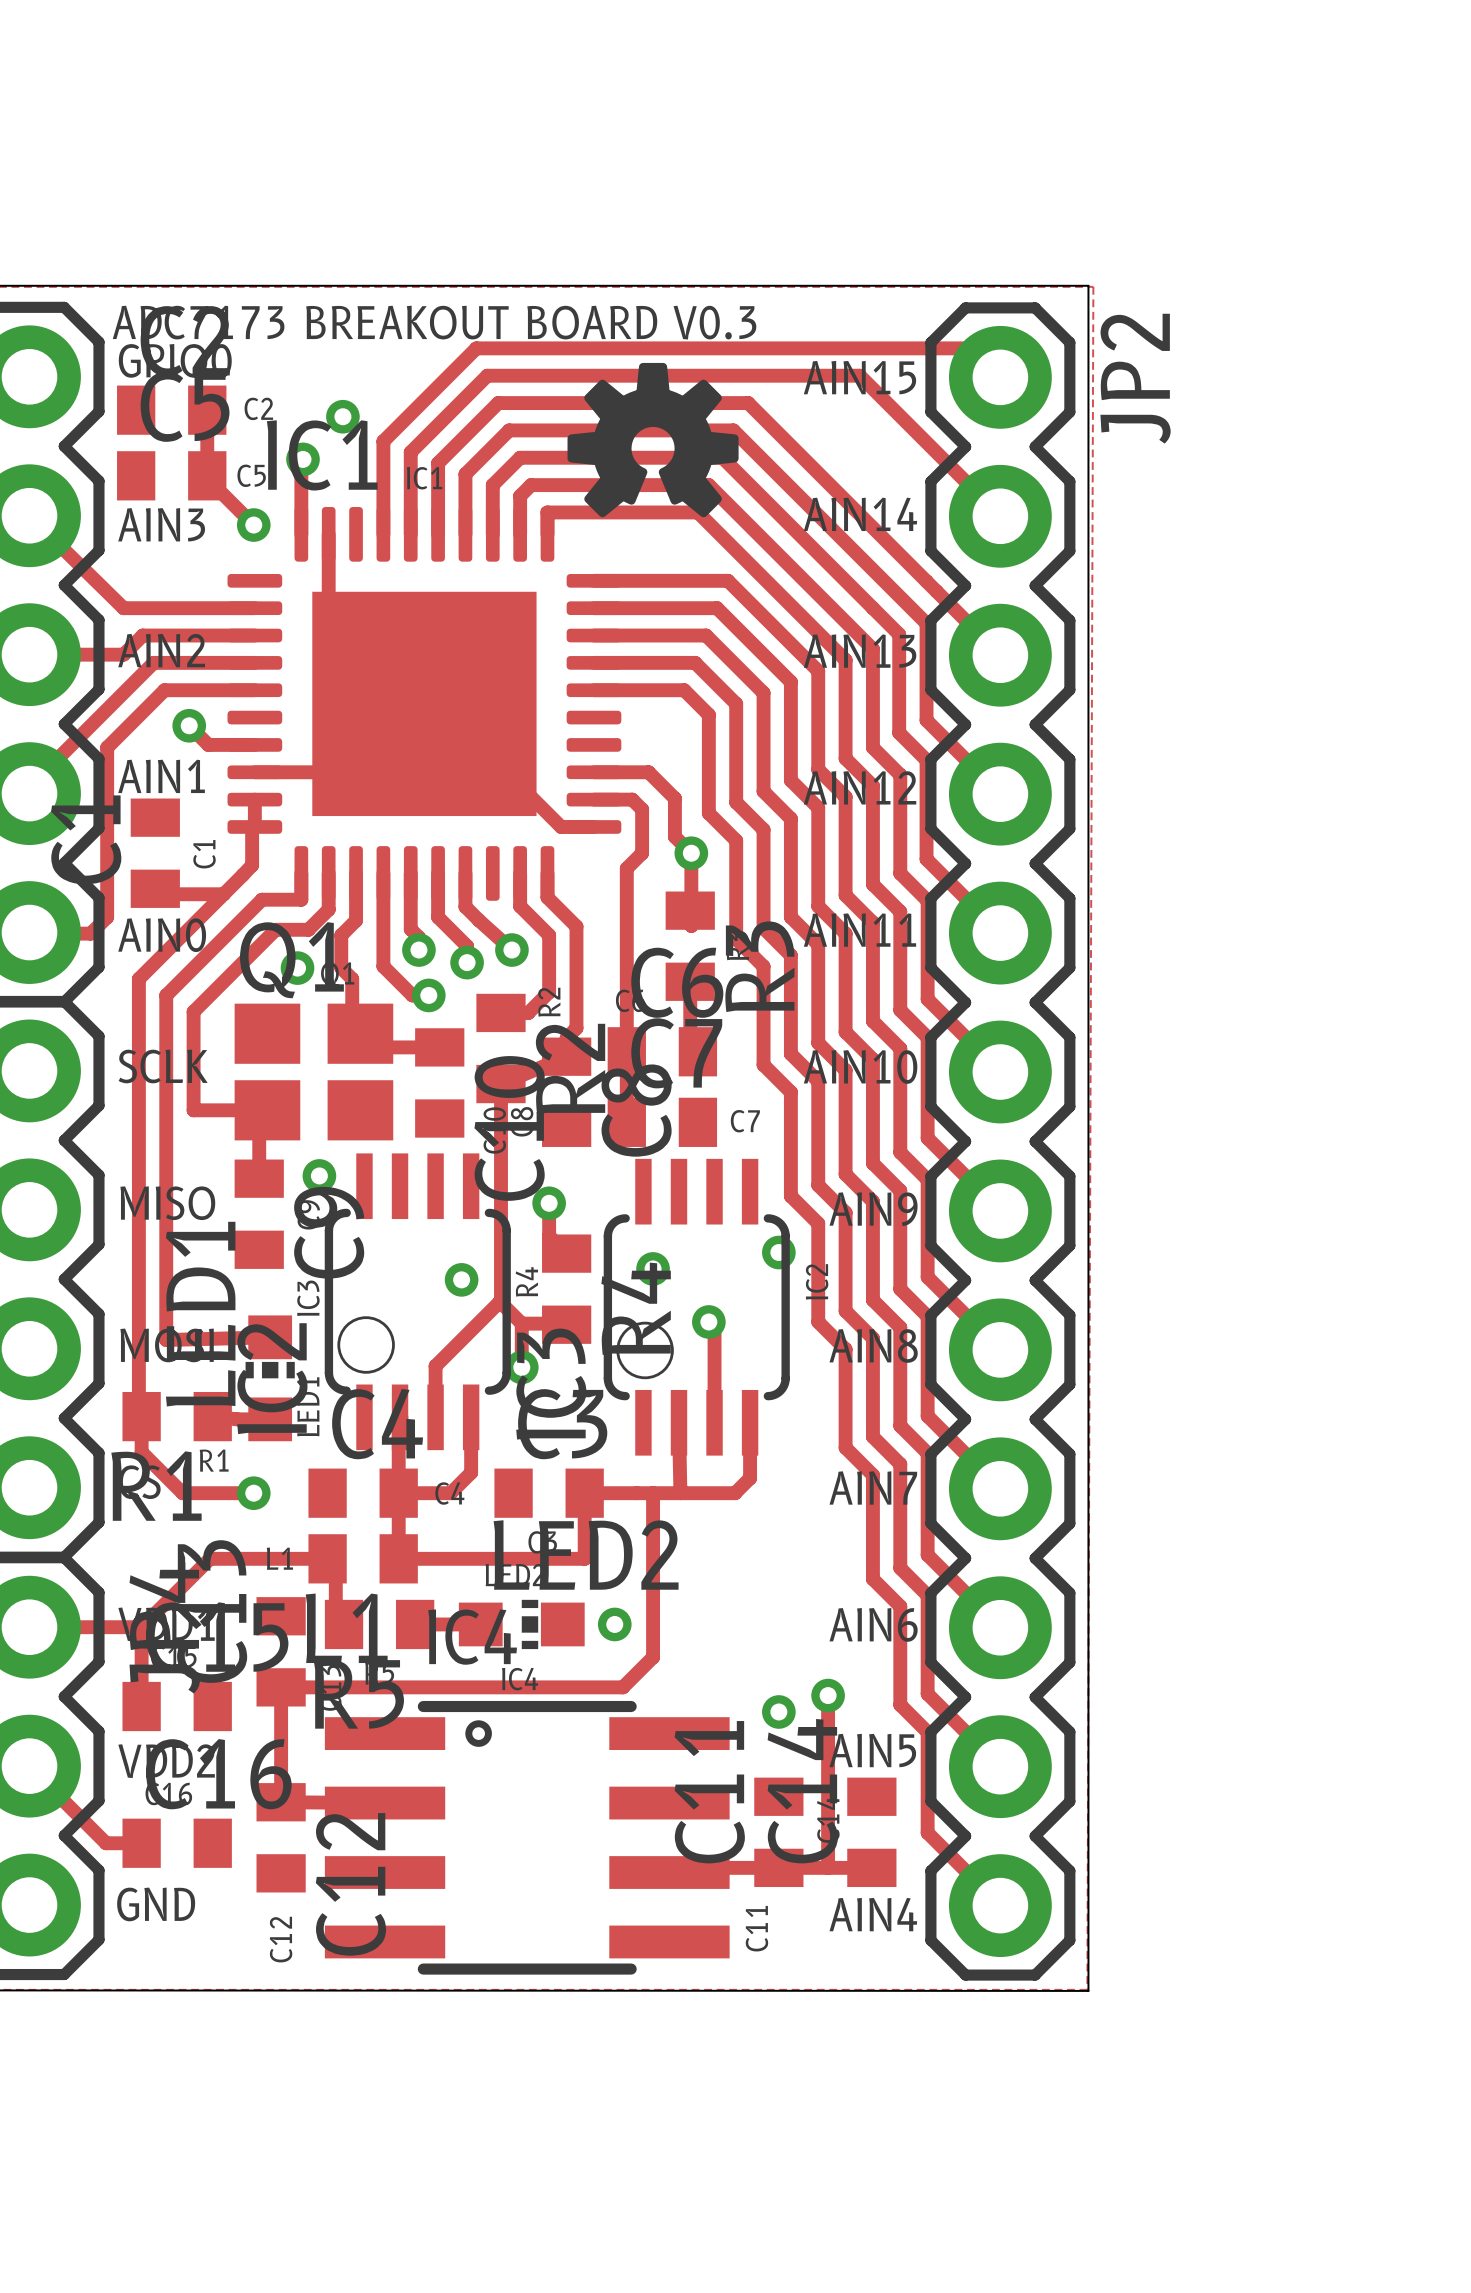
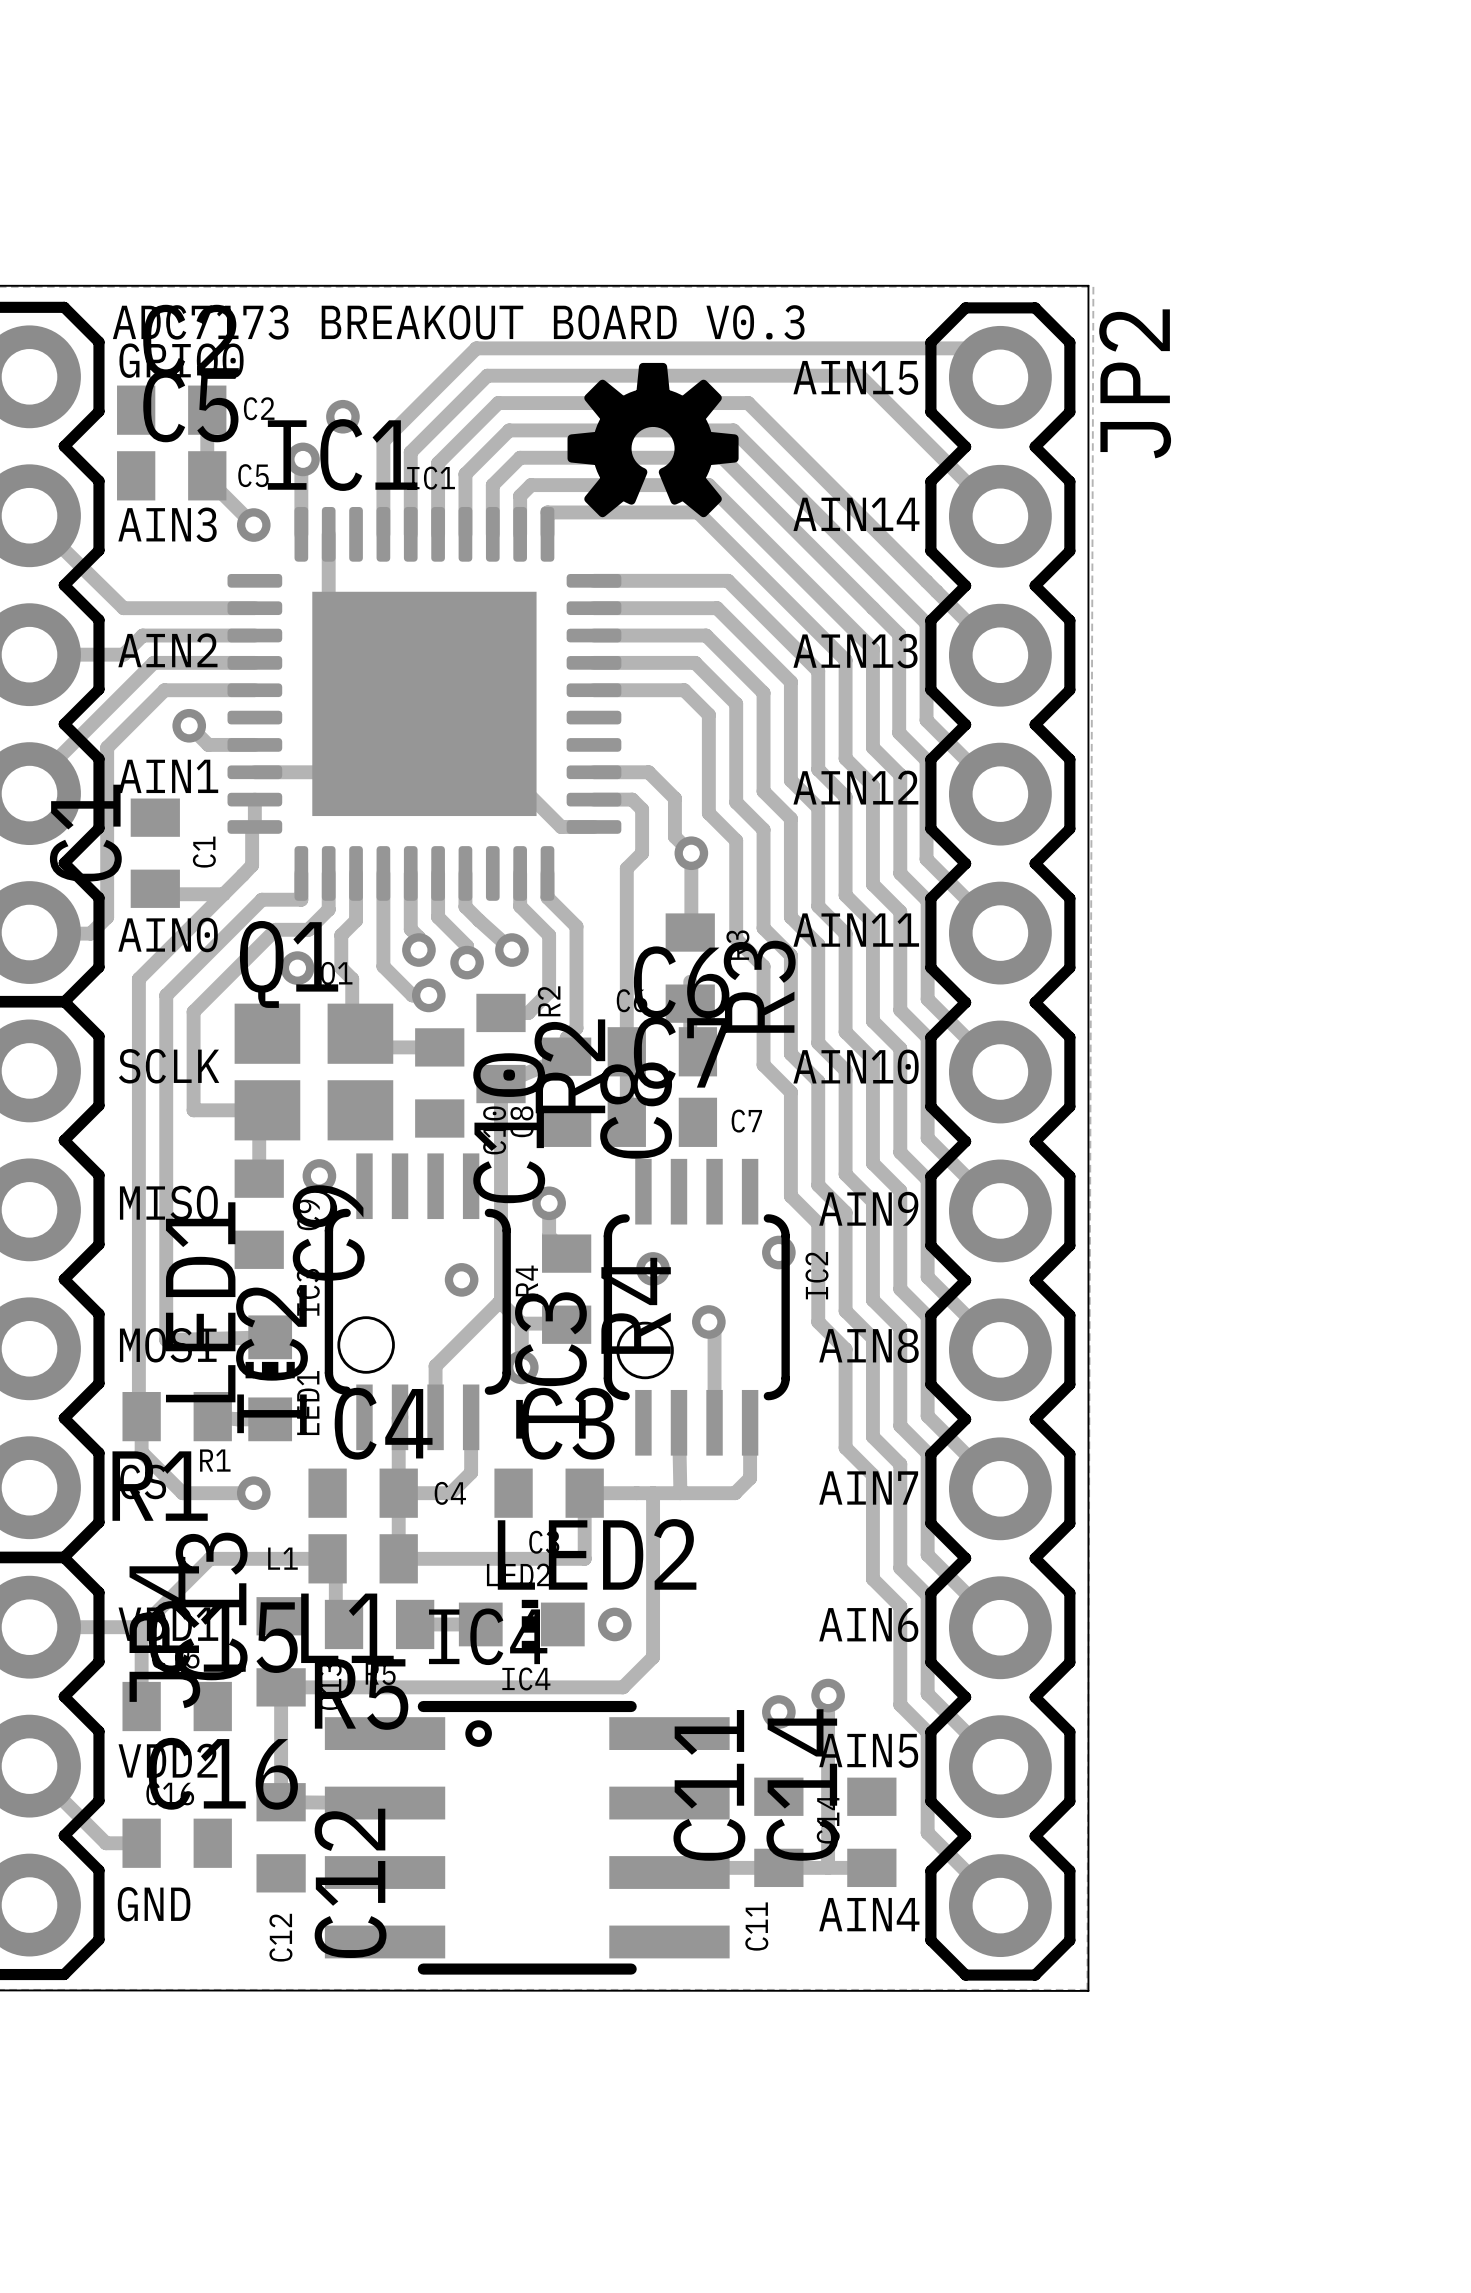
R3 position: (690, 946) -> (690, 968)

